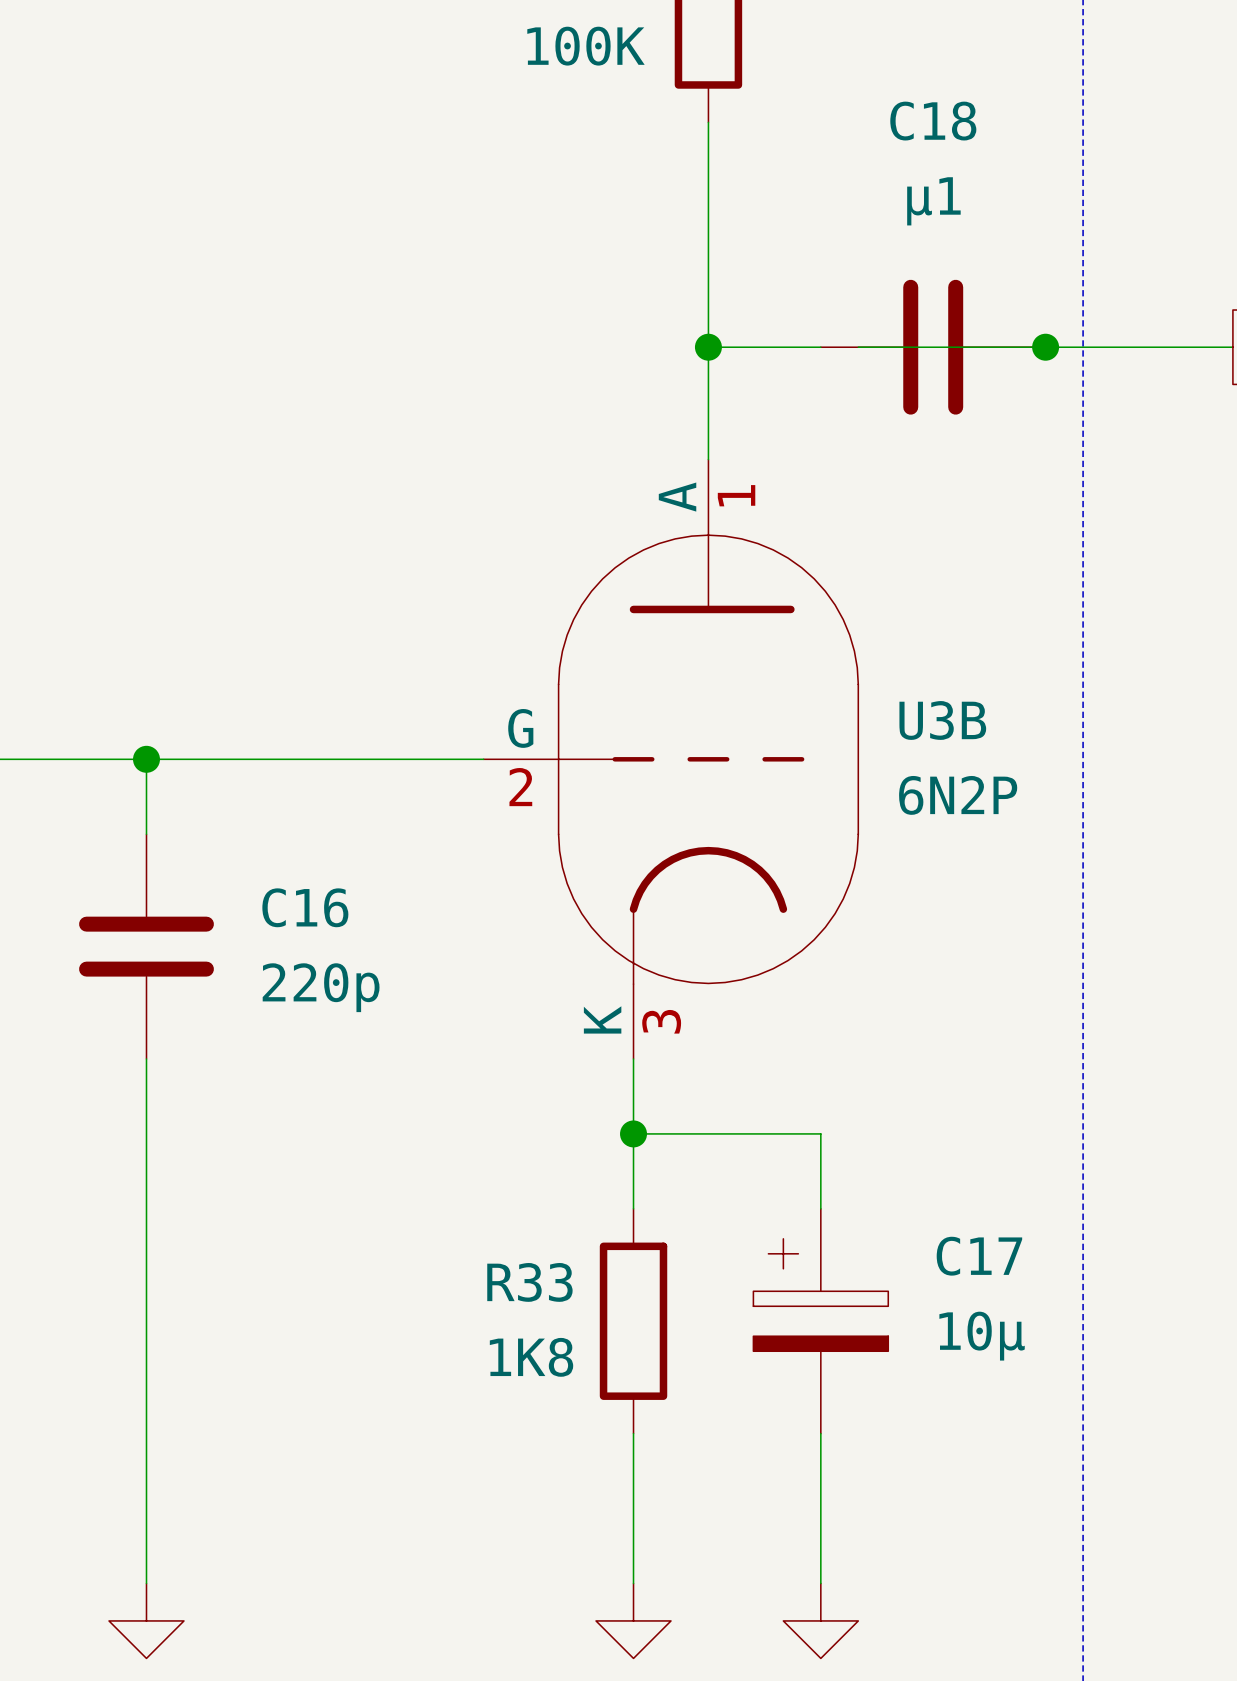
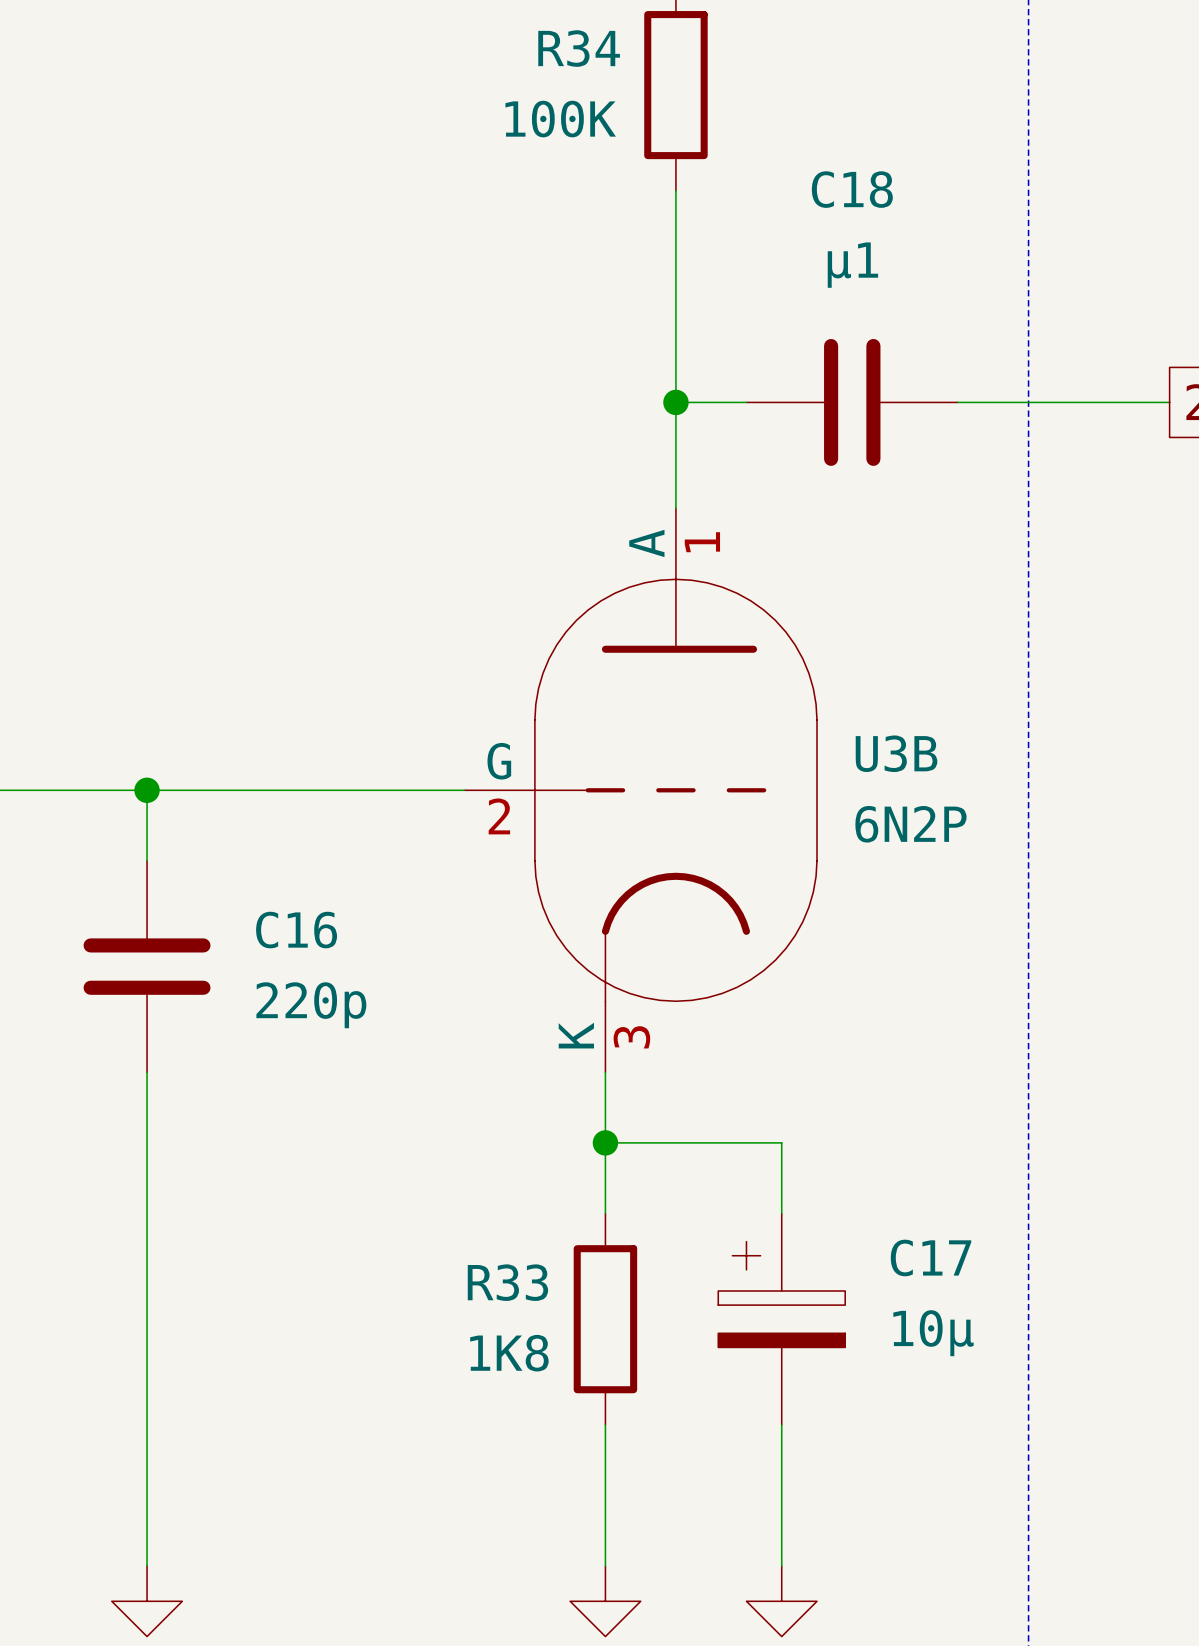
C18 position: (933, 347) -> (852, 402)
junction: (1045, 347) -> none

